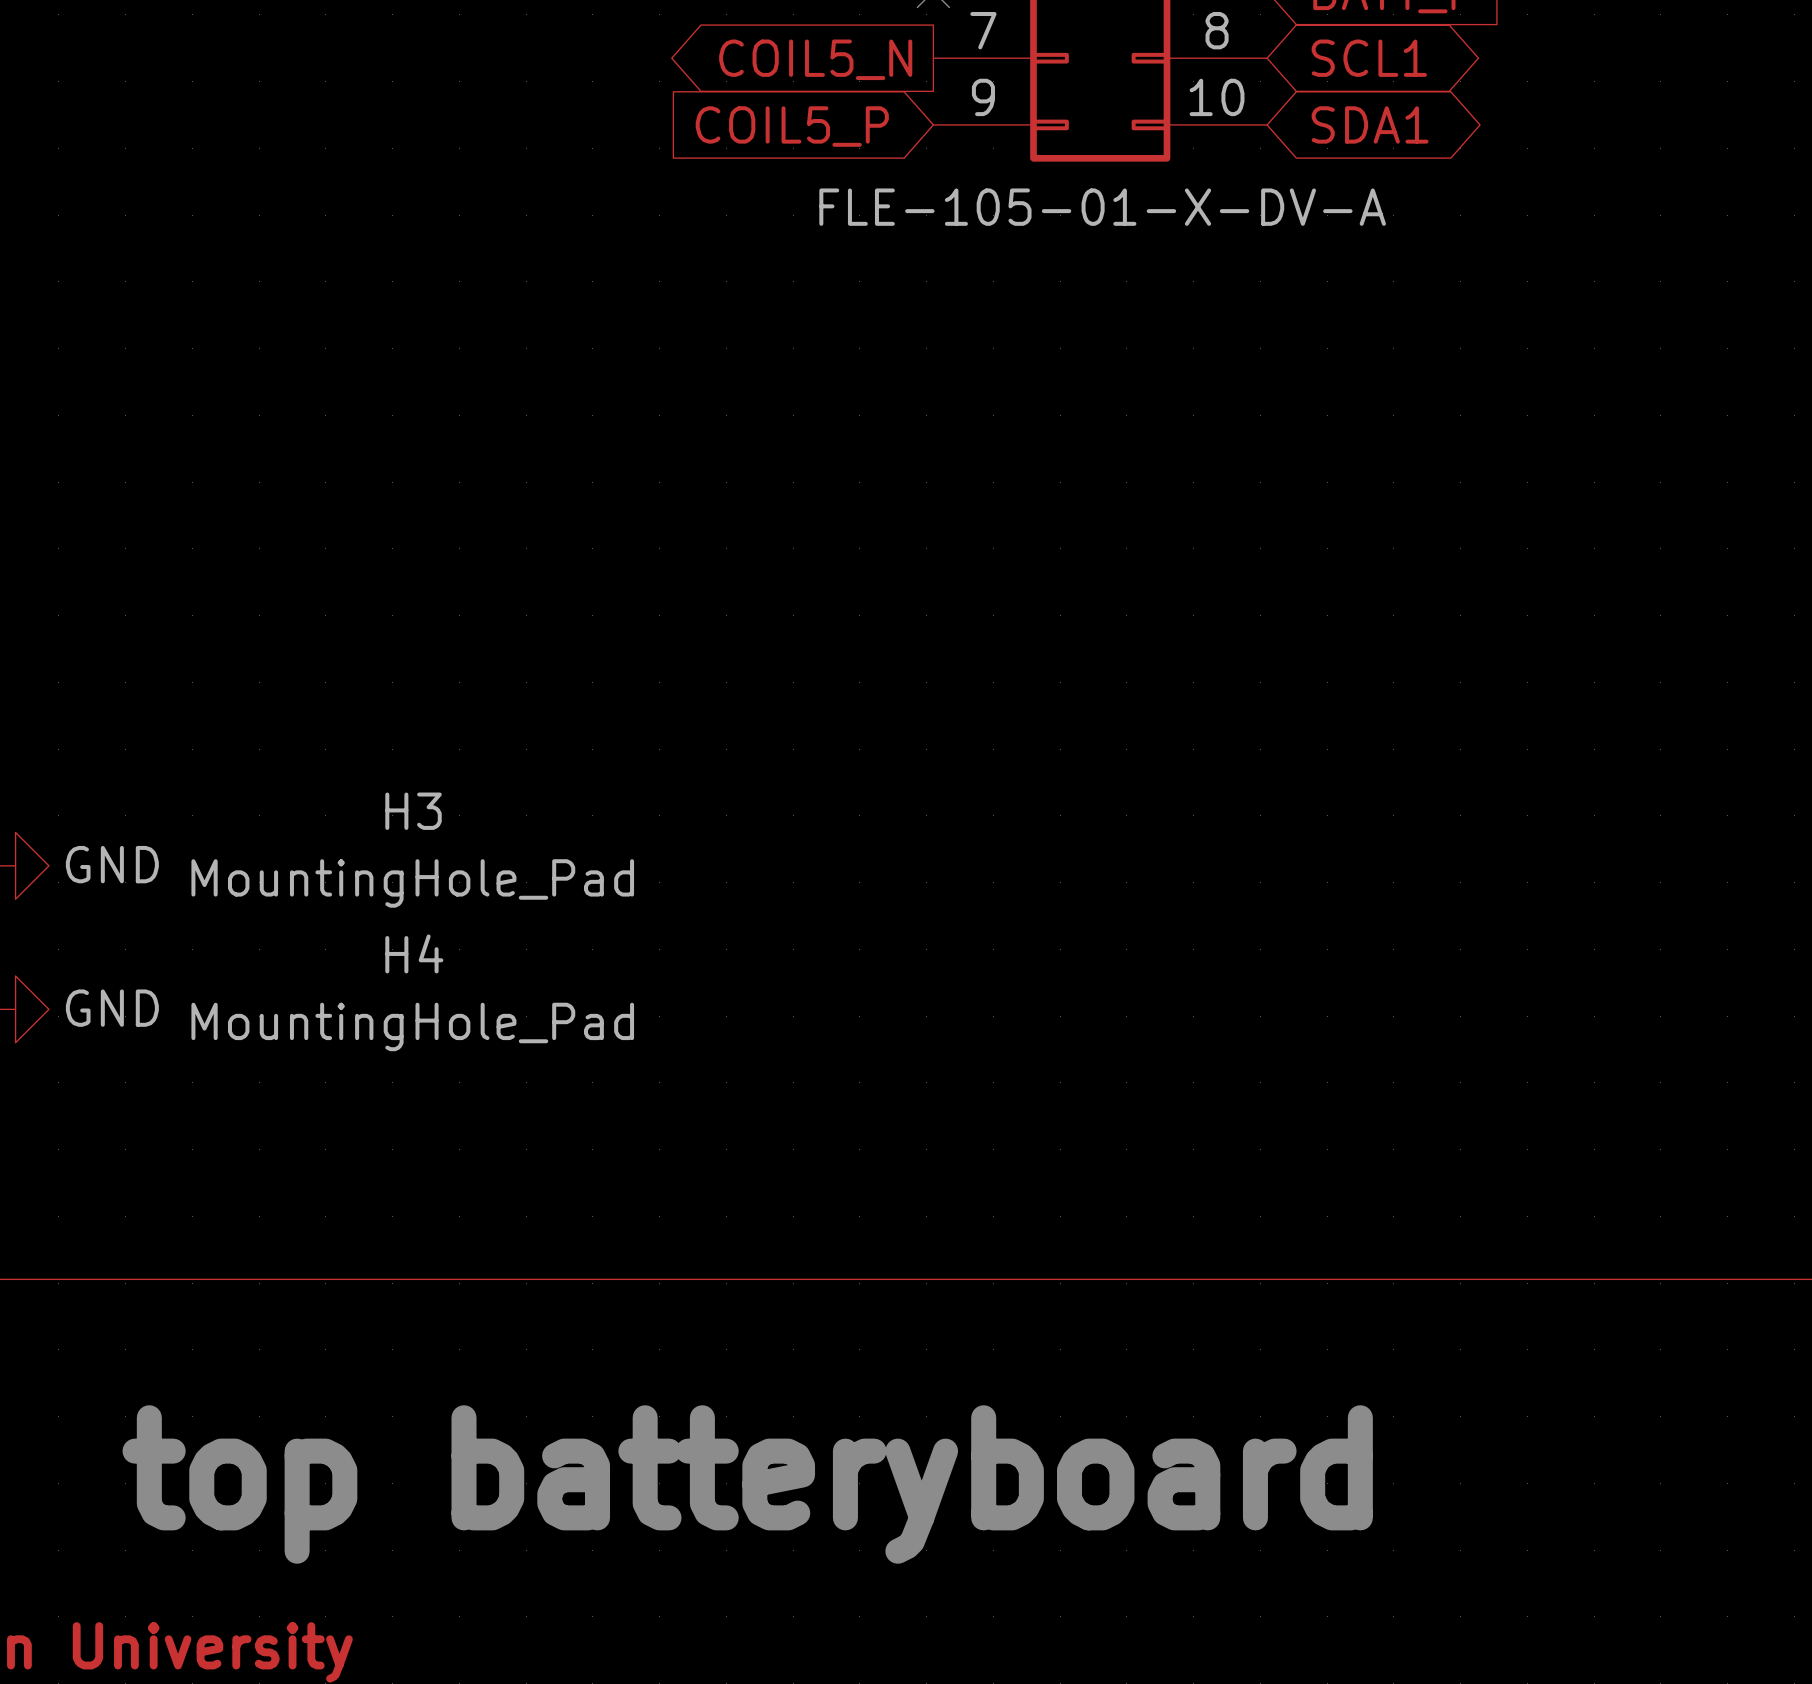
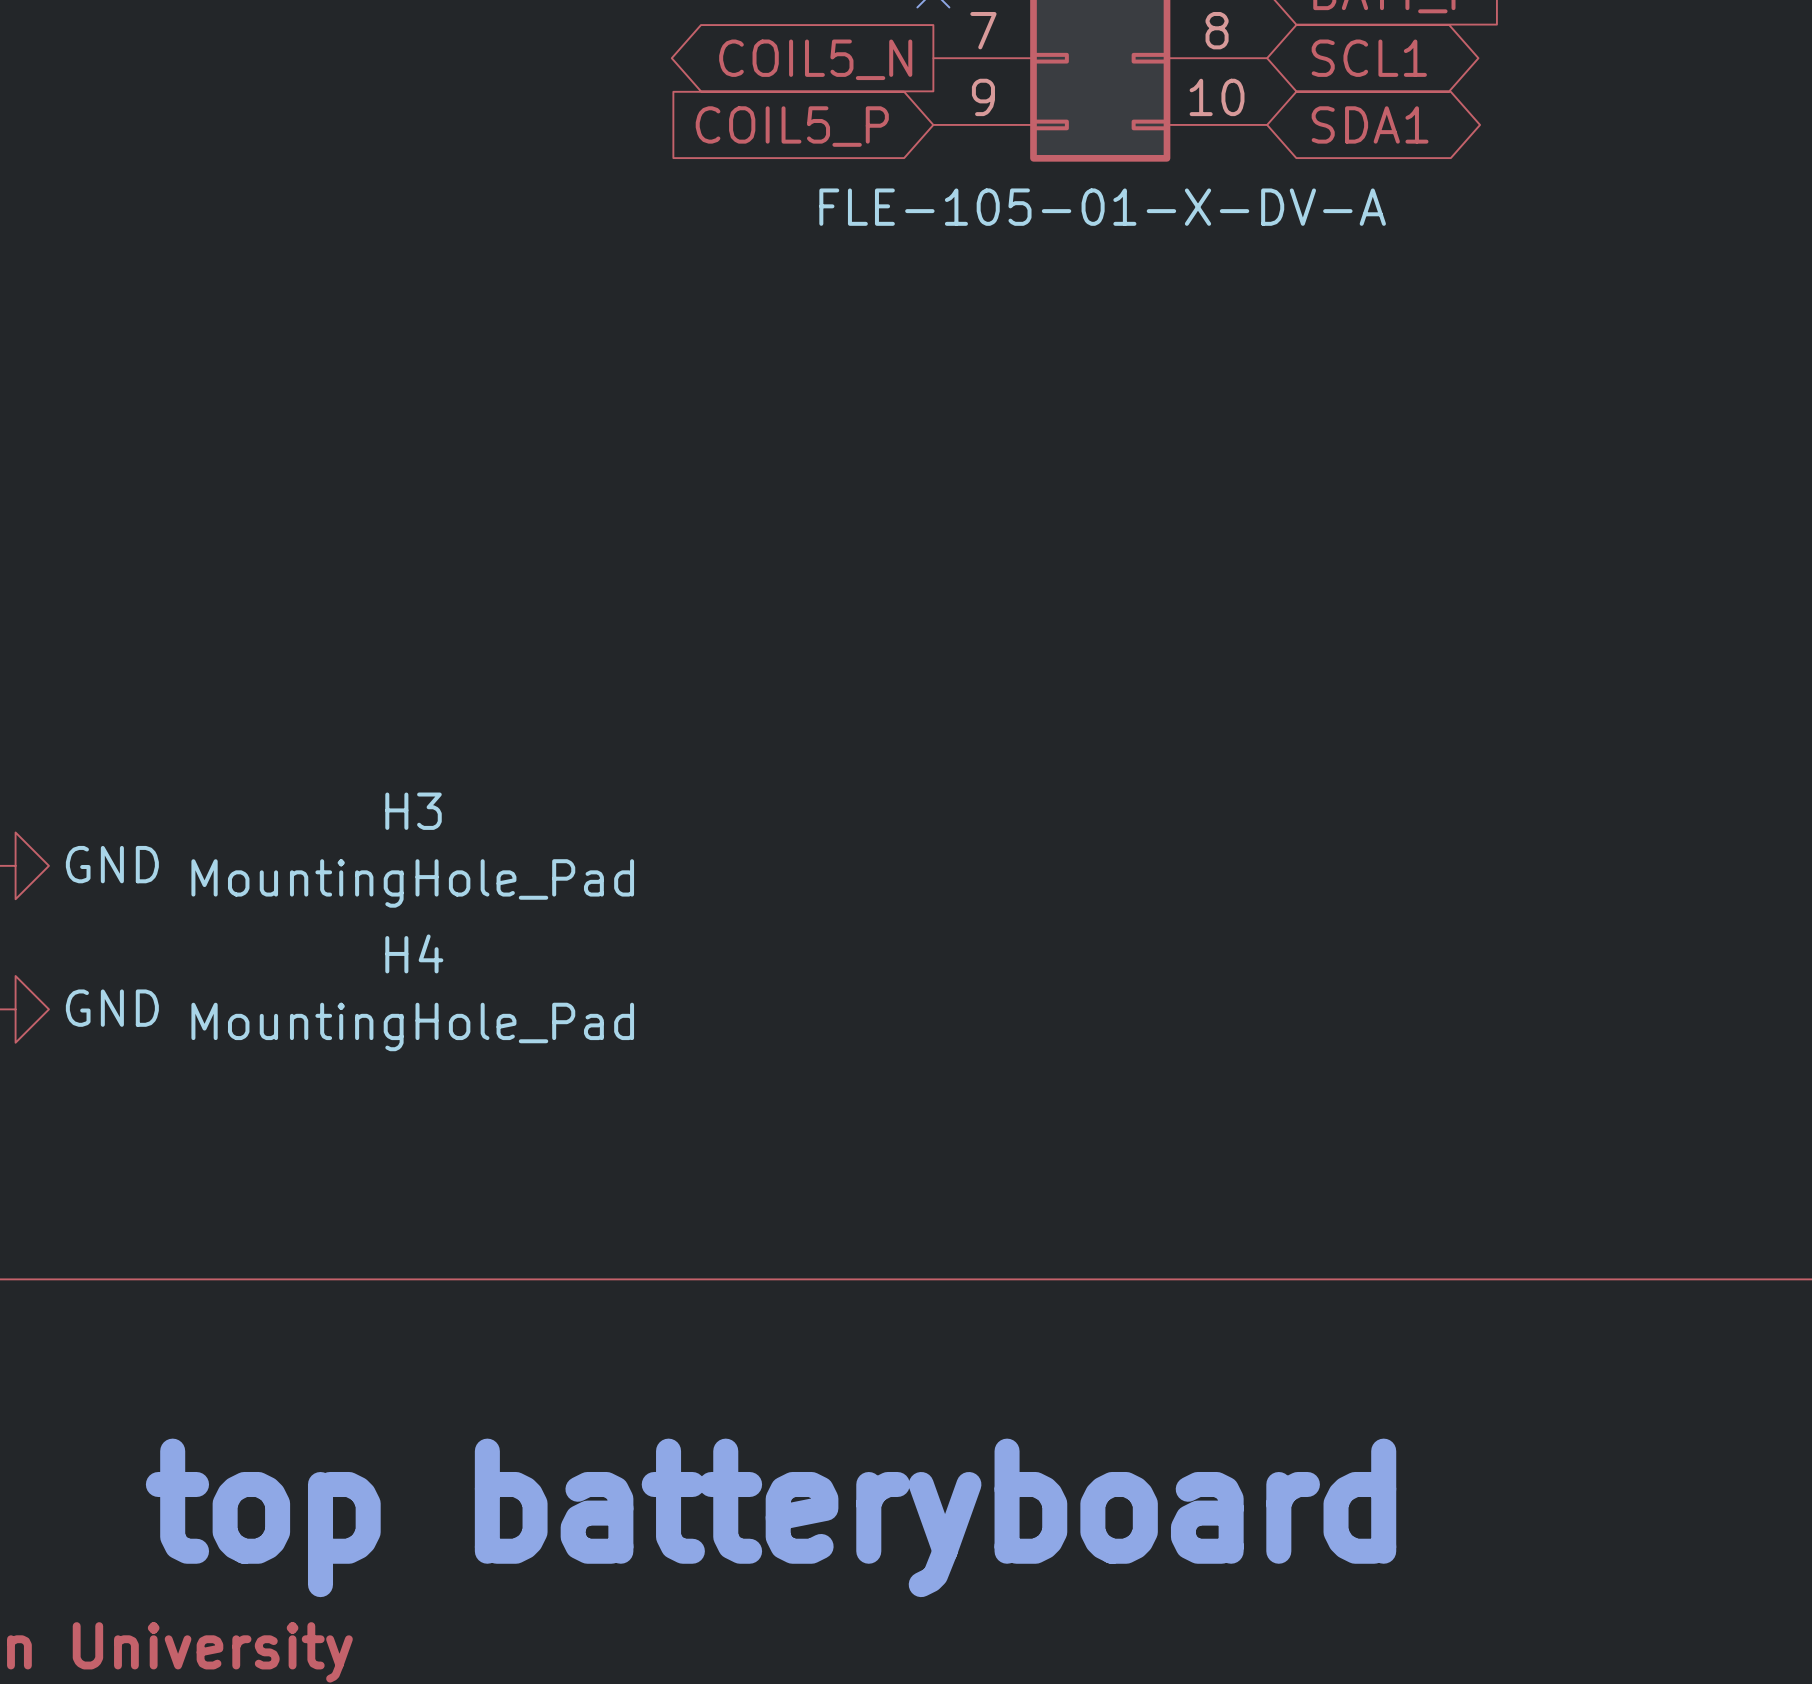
text position: top batteryboard (747, 1484) -> top batteryboard (771, 1517)

